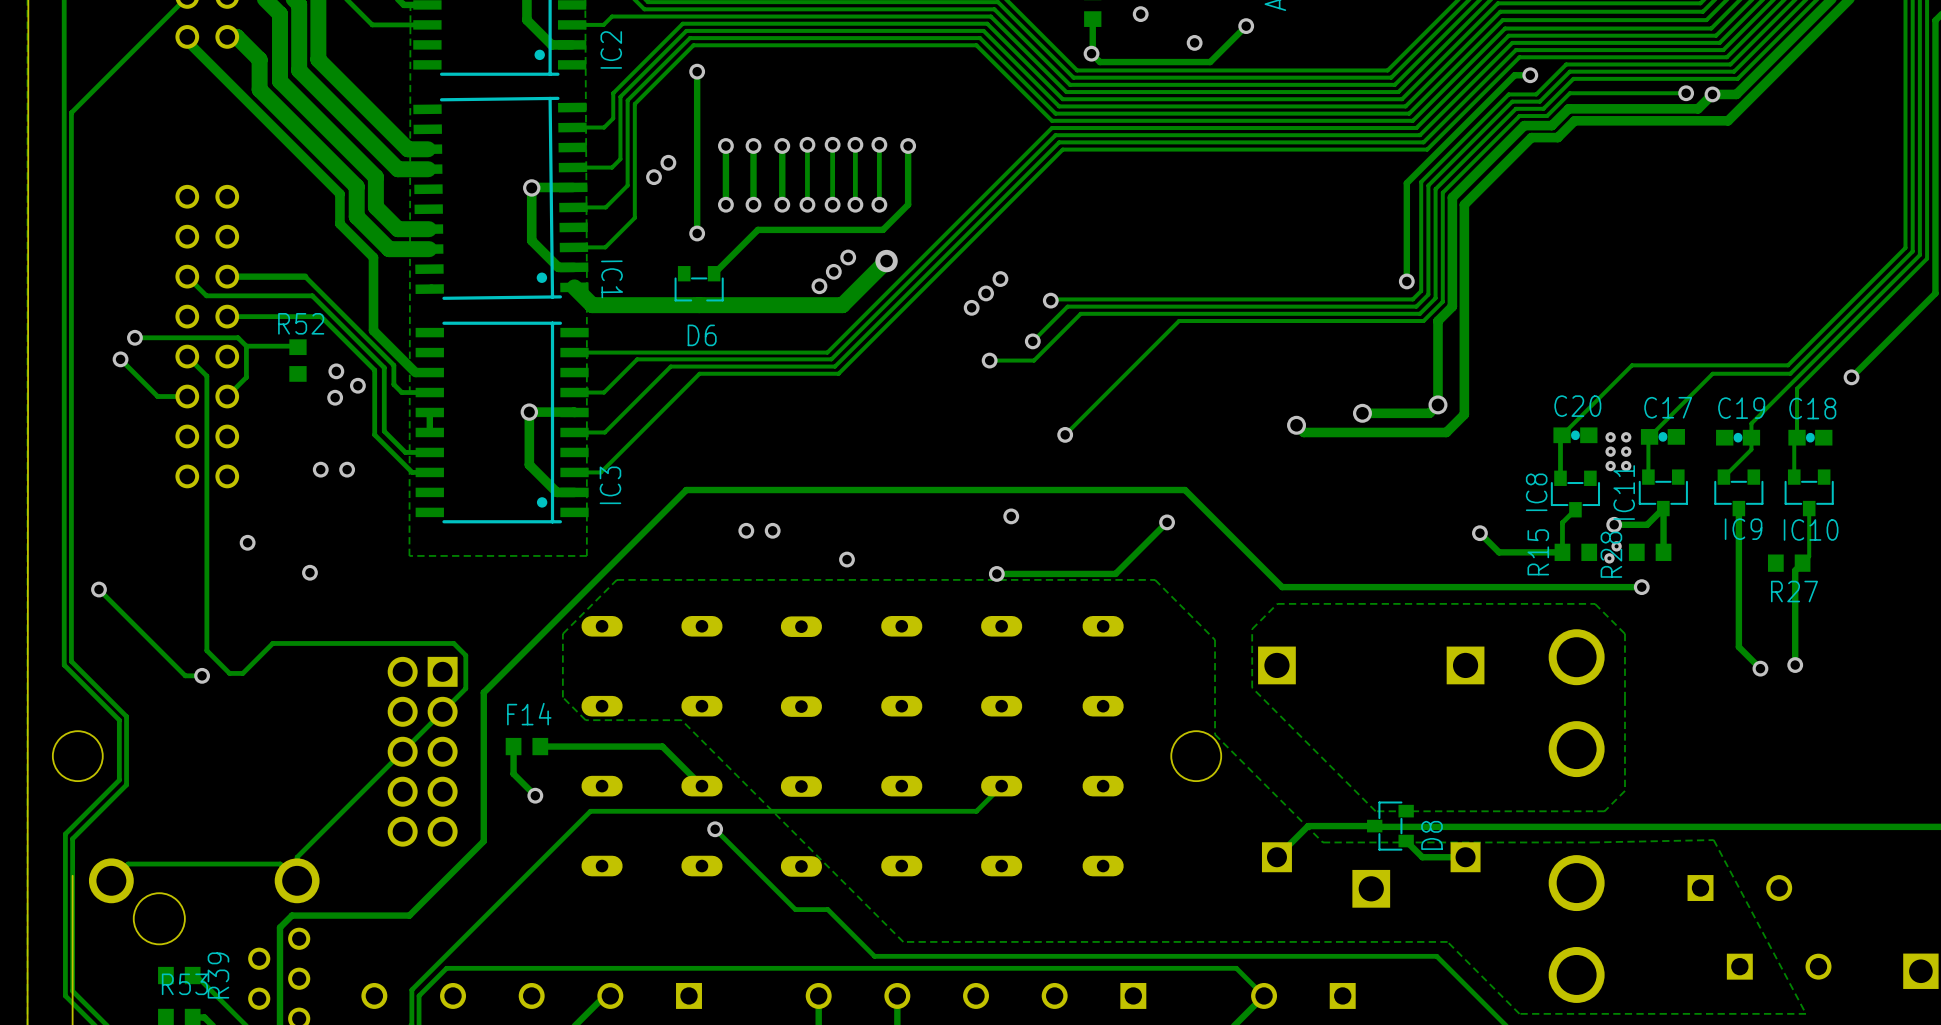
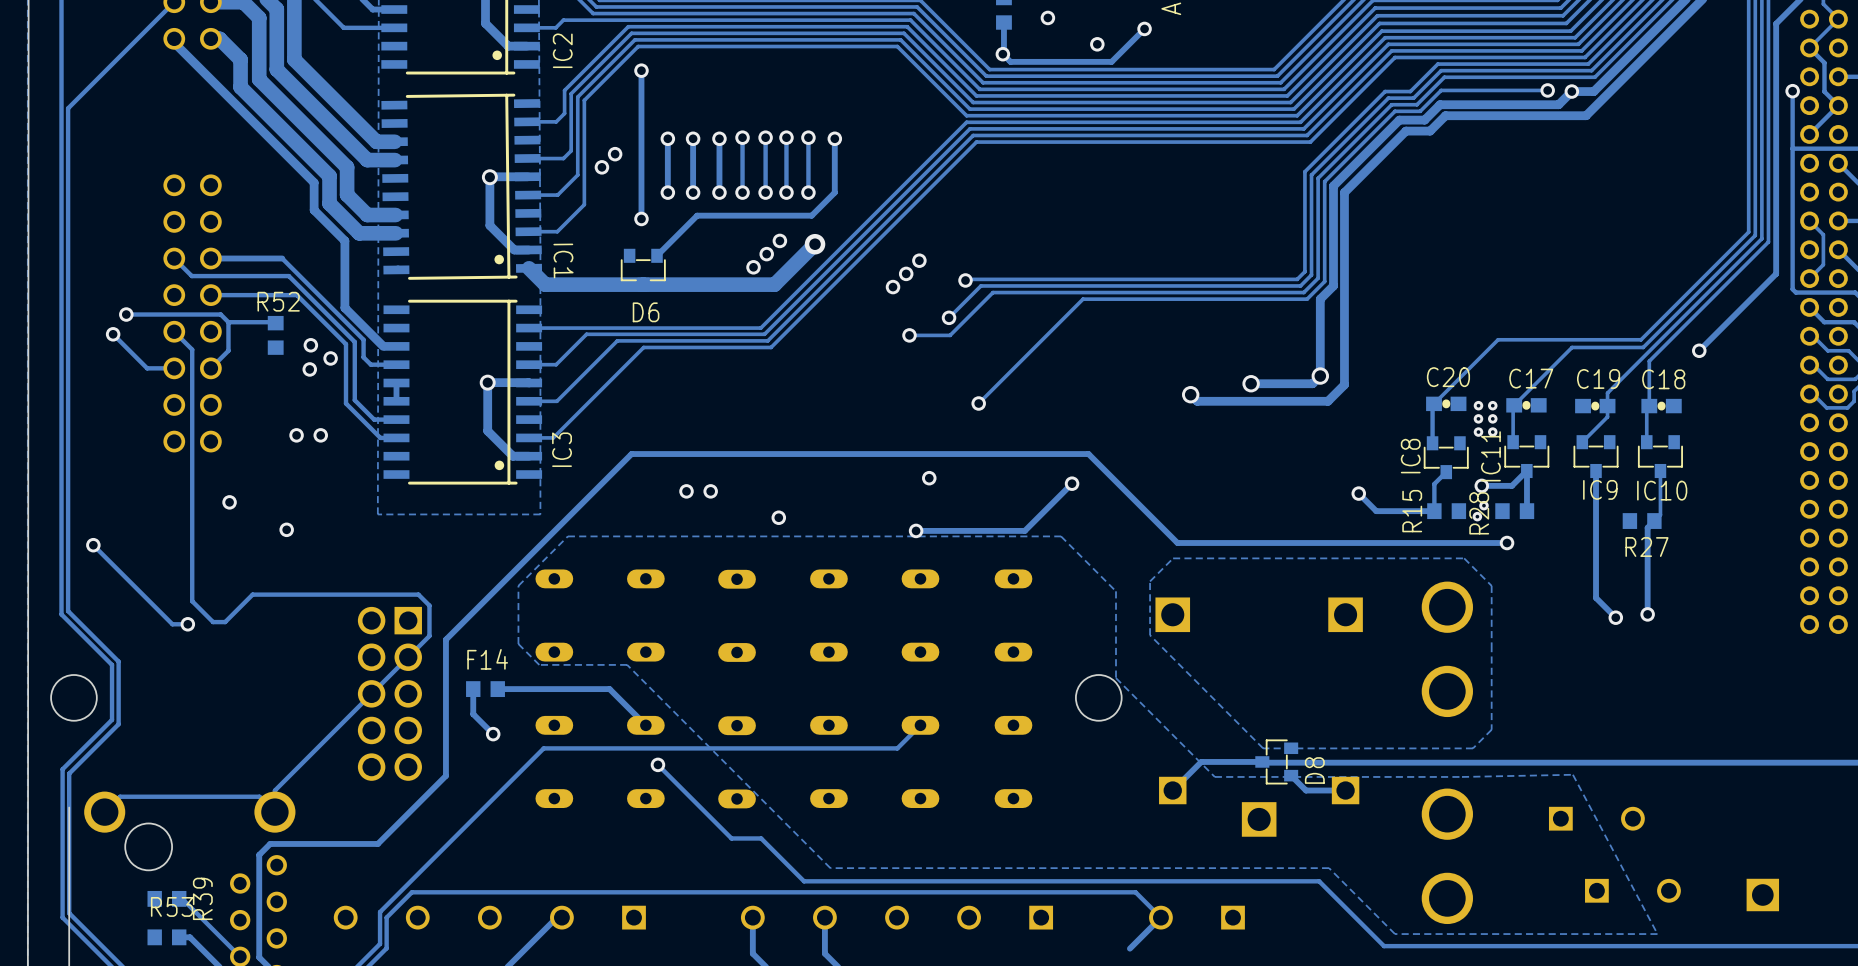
track: (1530, 75) (1514, 75) (1406, 183) (1406, 281) -> none
via: (1530, 75) -> none
via: (1406, 281) -> none

